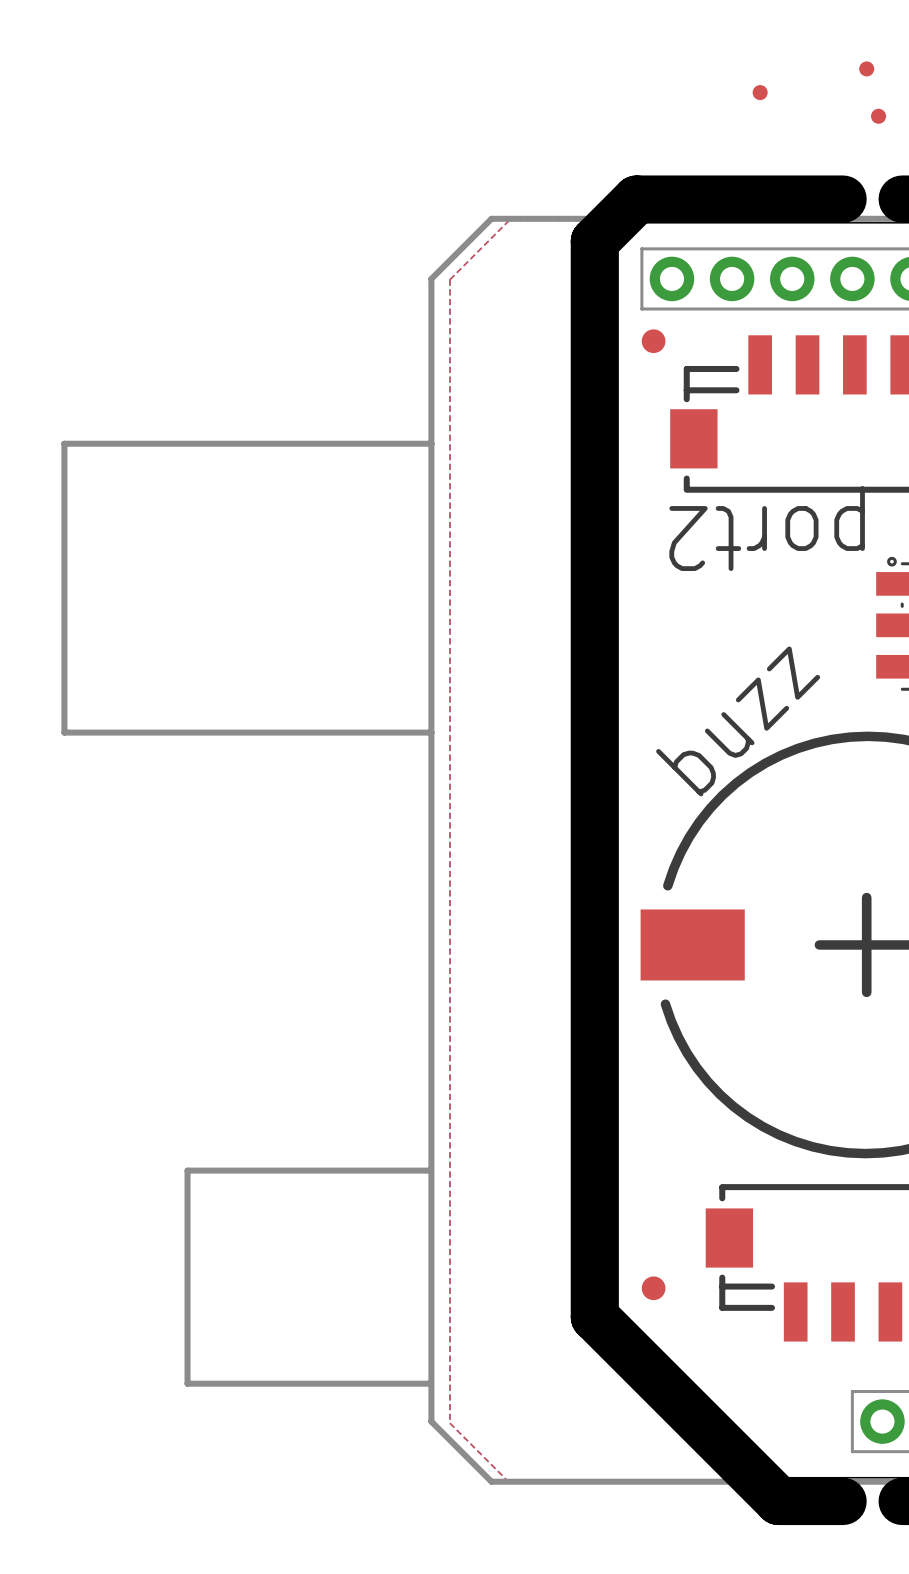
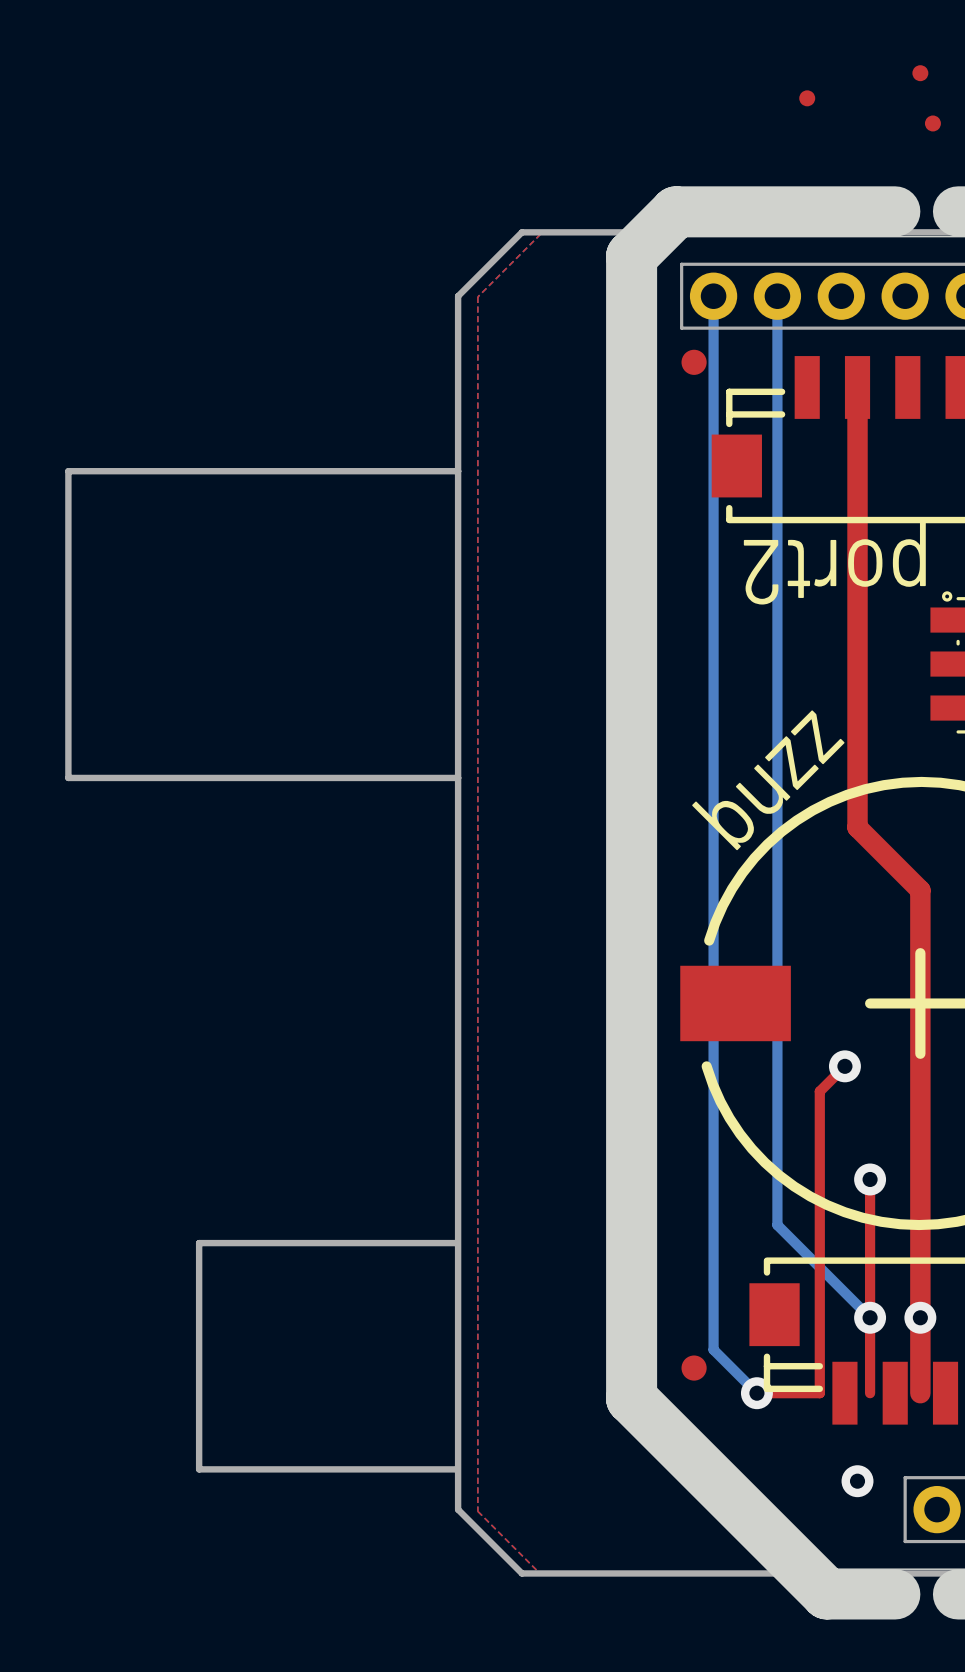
bottom track: none -> (713, 296) (713, 1349) (756, 1393)
bottom track: none -> (777, 296) (777, 1225) (870, 1317)
top track: none -> (857, 387) (857, 827) (920, 890) (920, 1393)
top track: none -> (844, 1066) (819, 1091) (819, 1393) (756, 1393)
via: none -> (844, 1066)
top track: none -> (870, 1179) (870, 1393)
via: none -> (870, 1179)
via: none -> (870, 1317)
via: none -> (920, 1317)
via: none -> (756, 1393)
via: none -> (857, 1481)

